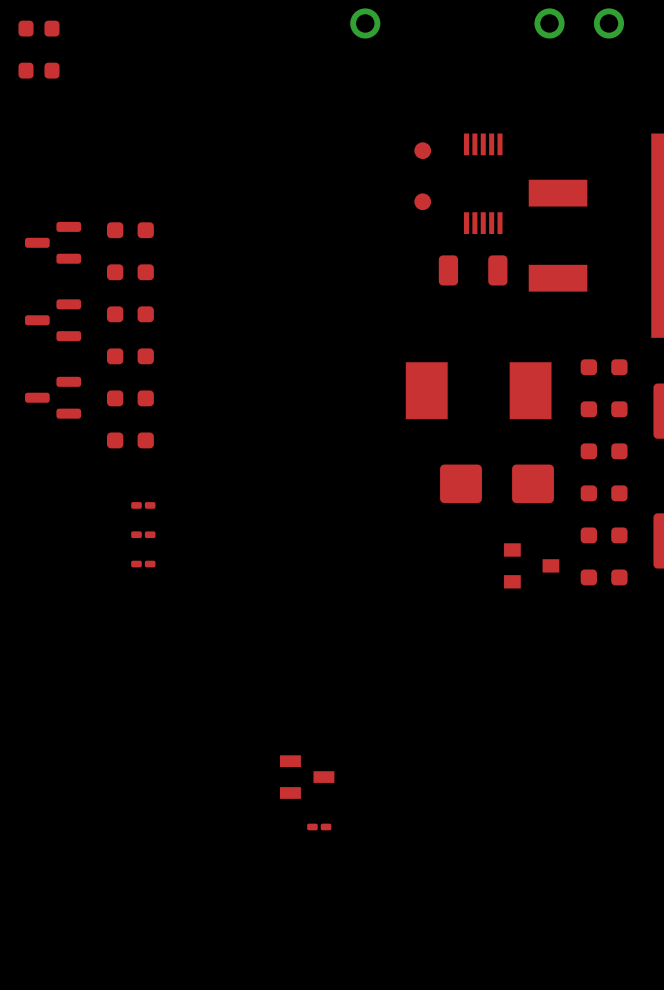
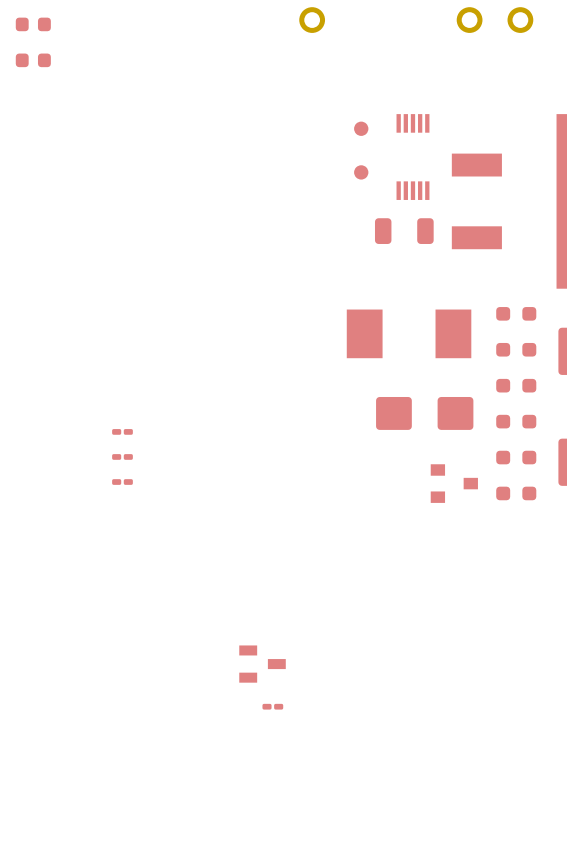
part: (130, 230) -> none
part: (53, 242) -> none
part: (130, 272) -> none
part: (130, 314) -> none
part: (53, 320) -> none
part: (130, 356) -> none
part: (53, 397) -> none
part: (130, 398) -> none
part: (130, 440) -> none

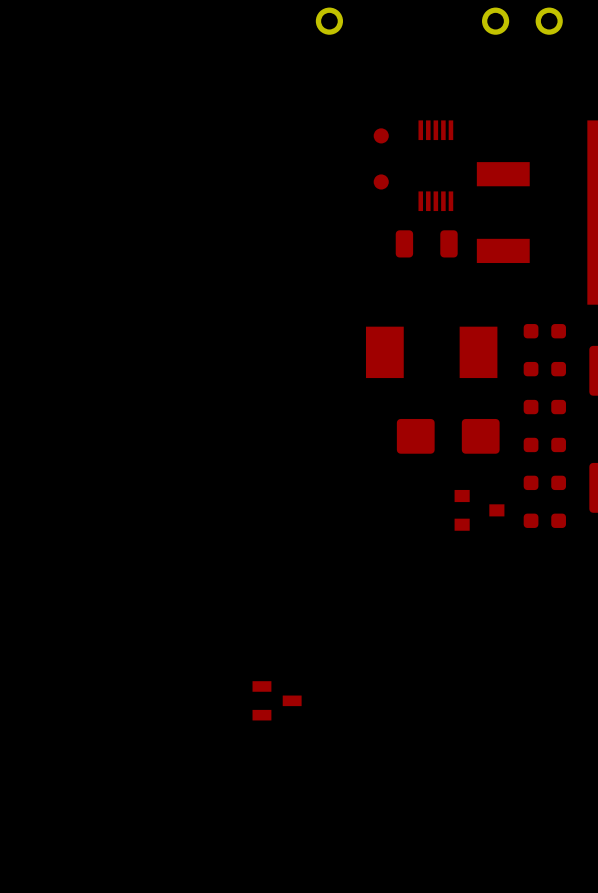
part: (33, 24) -> none
part: (33, 60) -> none
part: (122, 431) -> none
part: (122, 456) -> none
part: (122, 482) -> none
part: (272, 706) -> none

